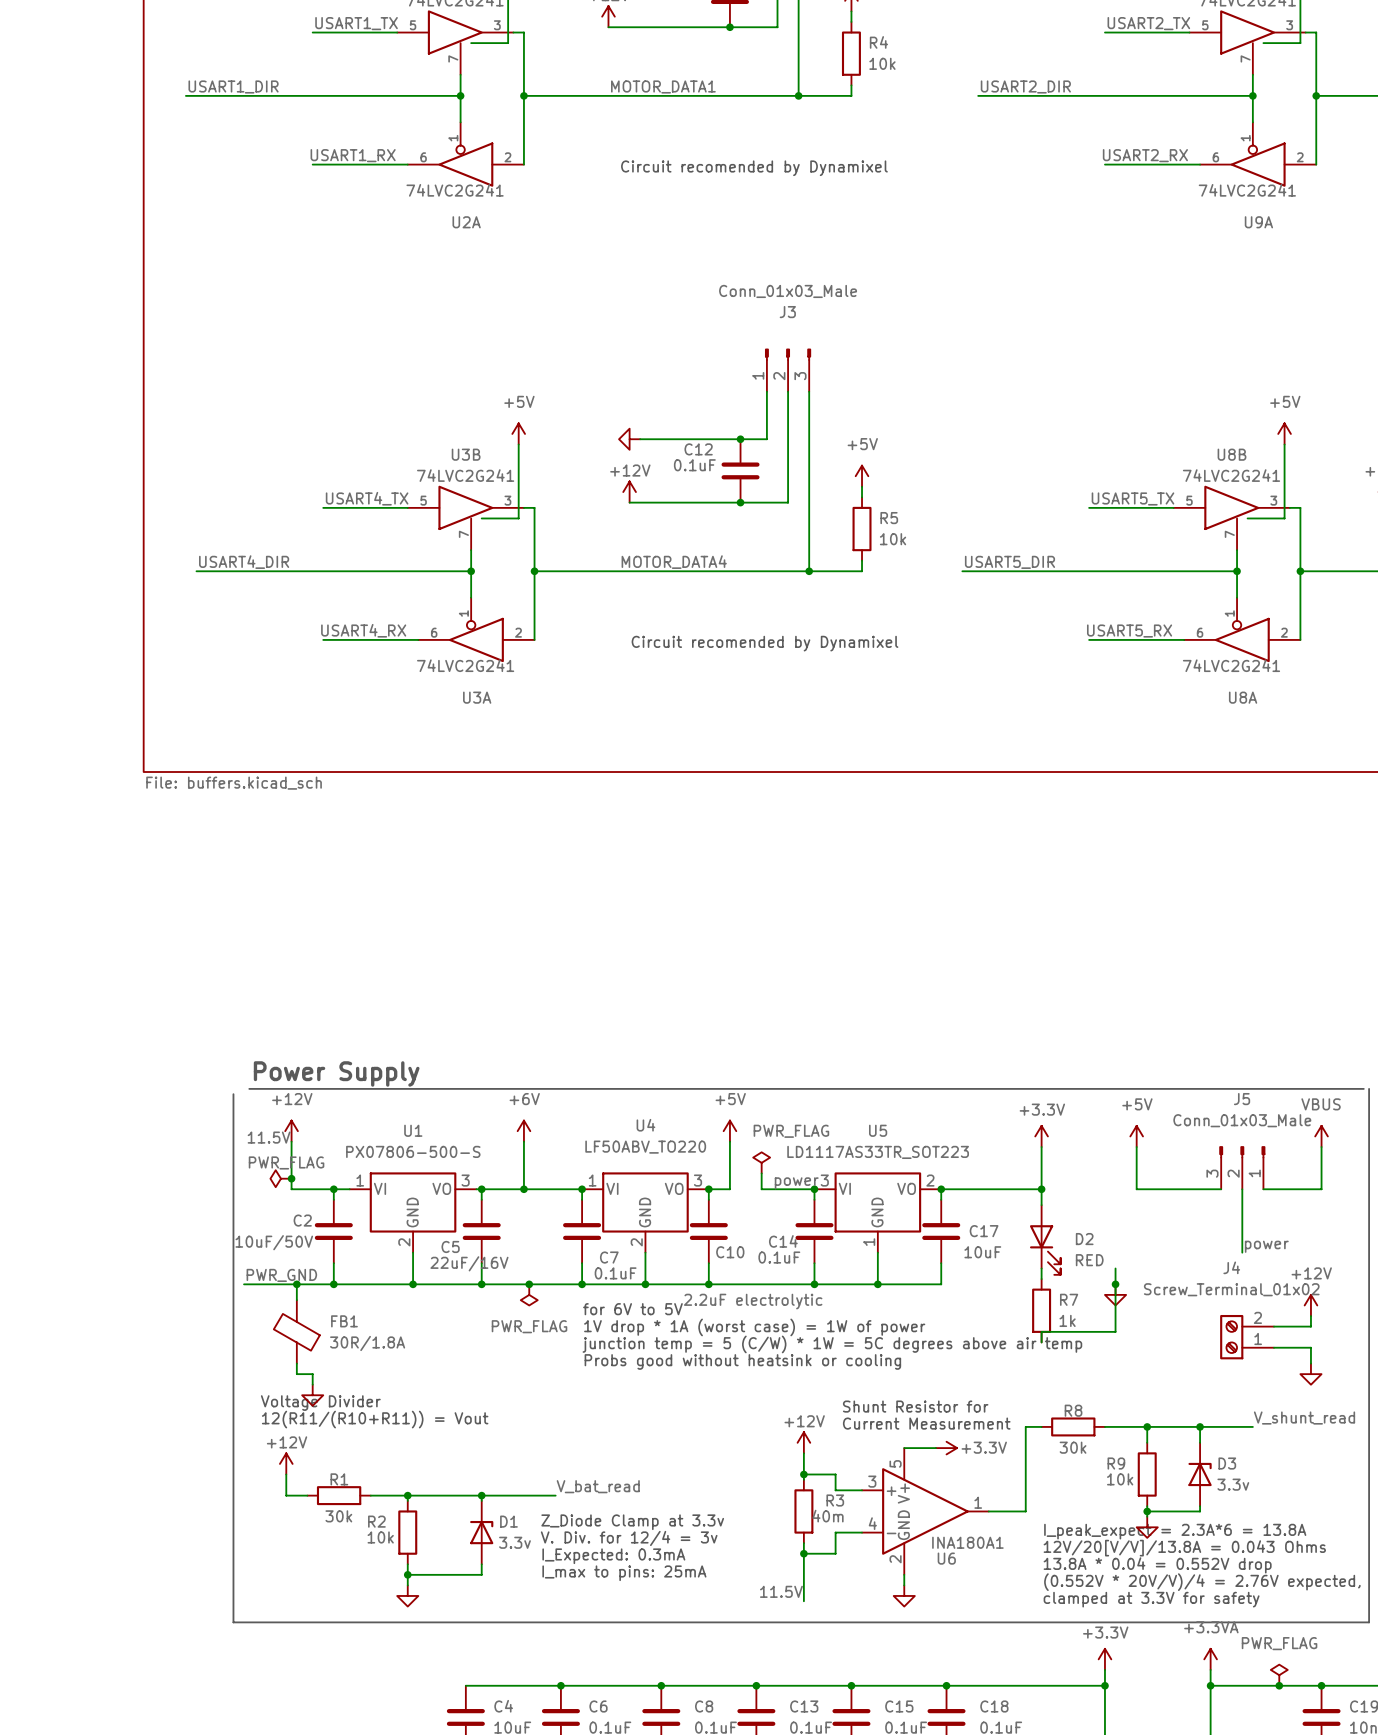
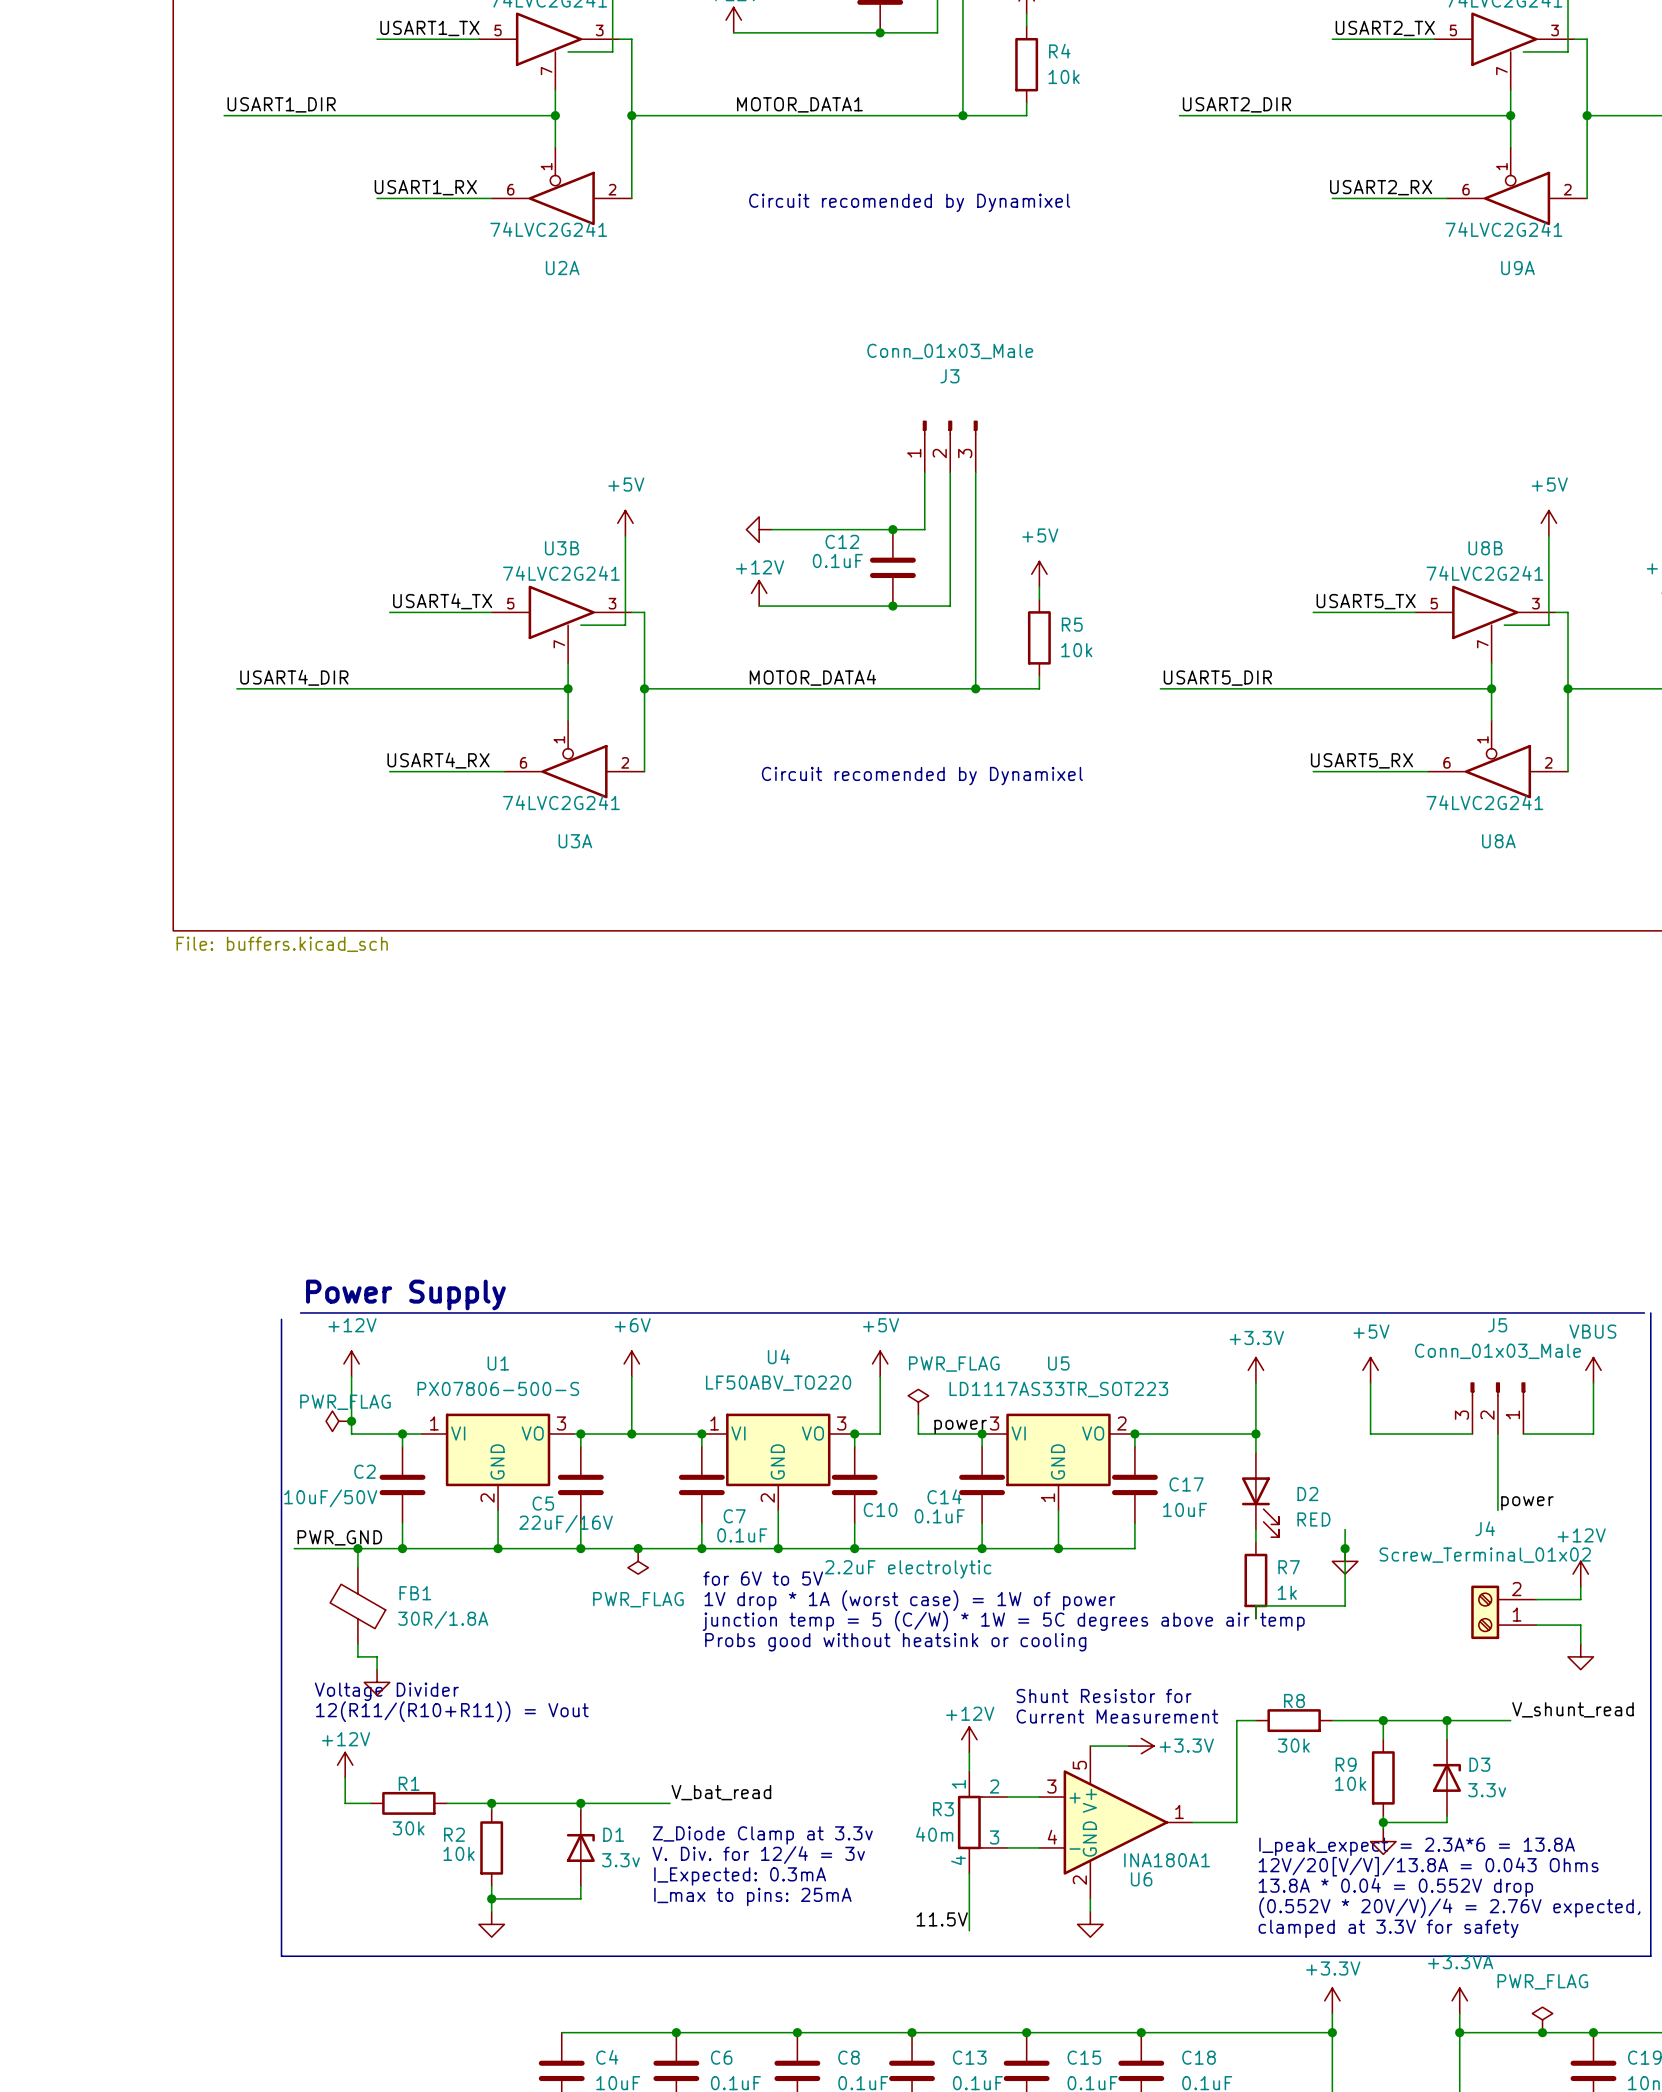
label: 11.5V (269, 1137) -> none
wire: (803, 1474) (835, 1474) (835, 1490) -> none
junction: (803, 1474) -> none
R3 symbol: [794, 1479, 814, 1544] -> [957, 1771, 1008, 1874]
R3 name position: R3 (835, 1500) -> R3 (943, 1809)
R3 value position: 40m (827, 1516) -> 40m (934, 1834)
wire: (835, 1532) (835, 1553) (803, 1553) (803, 1543) -> none
junction: (803, 1553) -> none

